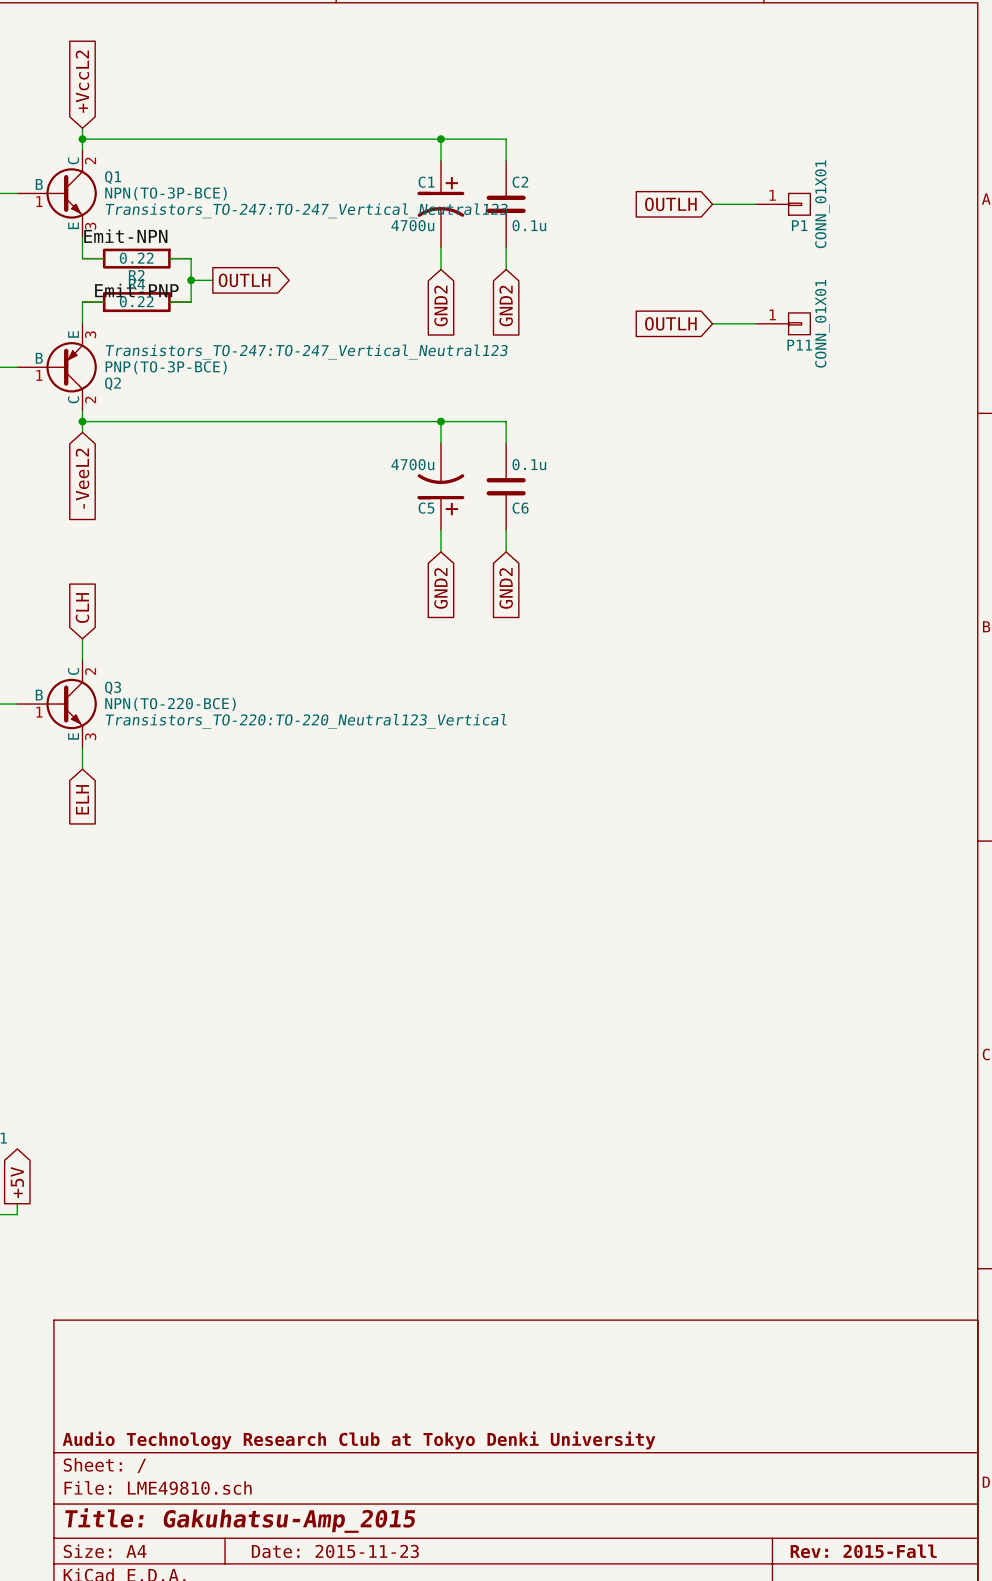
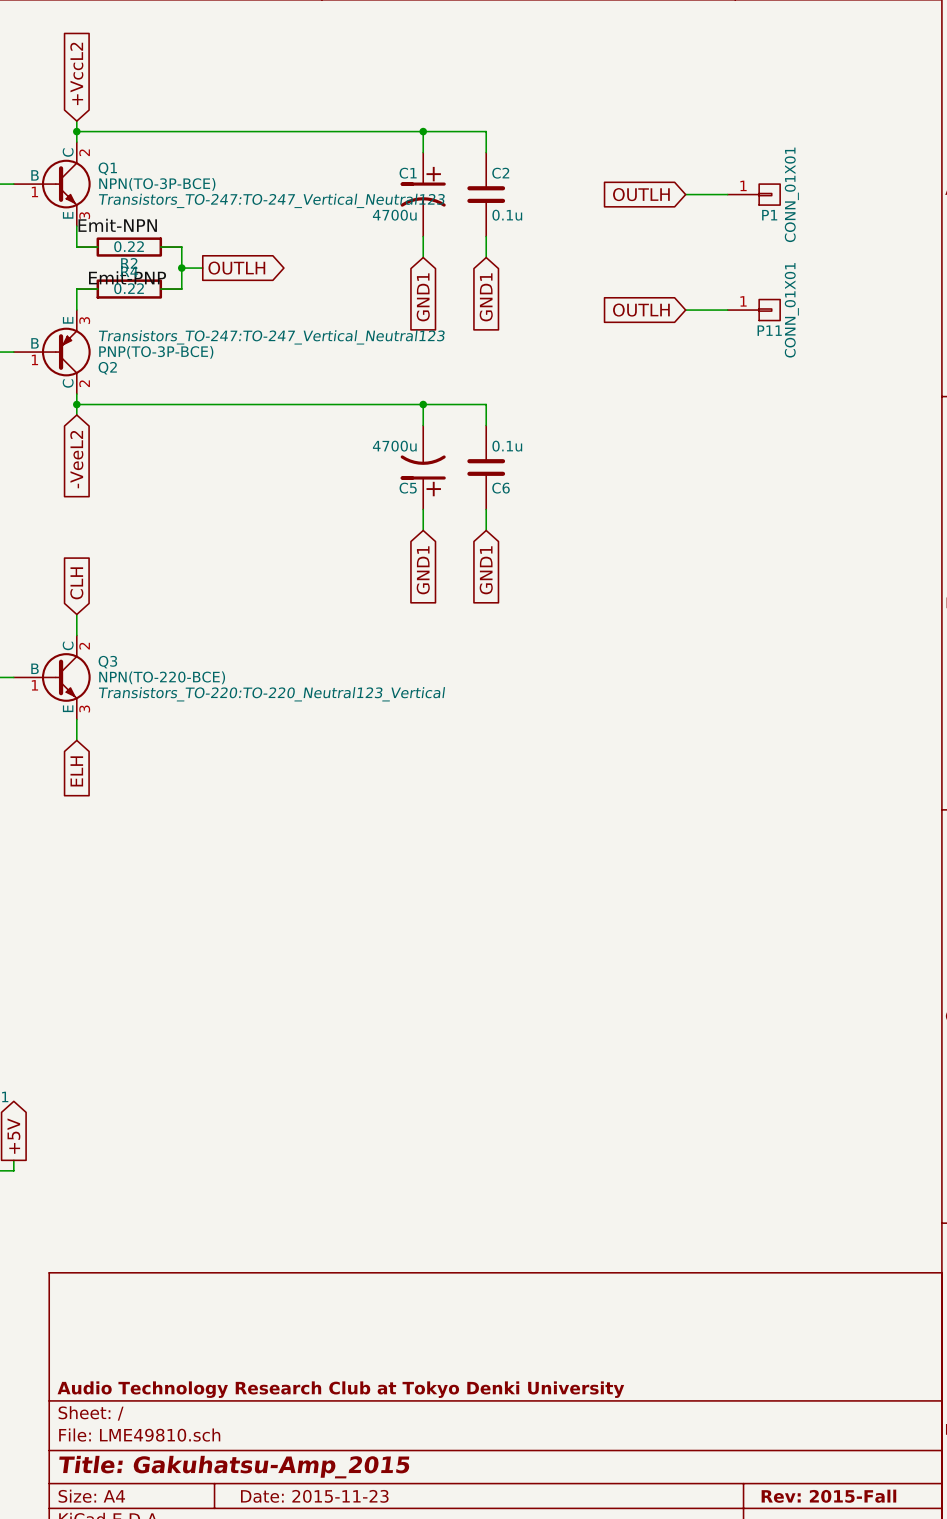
global label: GND2 (440, 306) -> GND1 (423, 297)
global label: GND2 (506, 306) -> GND1 (486, 297)
global label: GND2 (440, 588) -> GND1 (423, 570)
global label: GND2 (506, 588) -> GND1 (486, 570)

